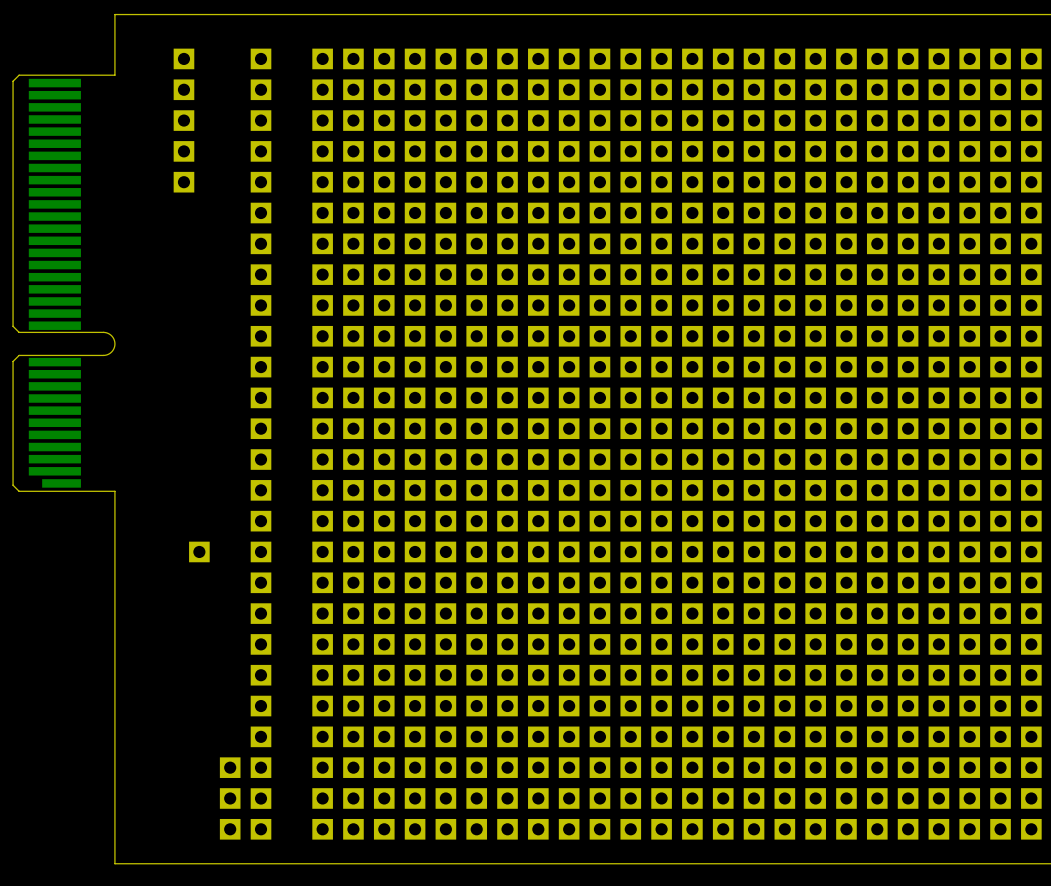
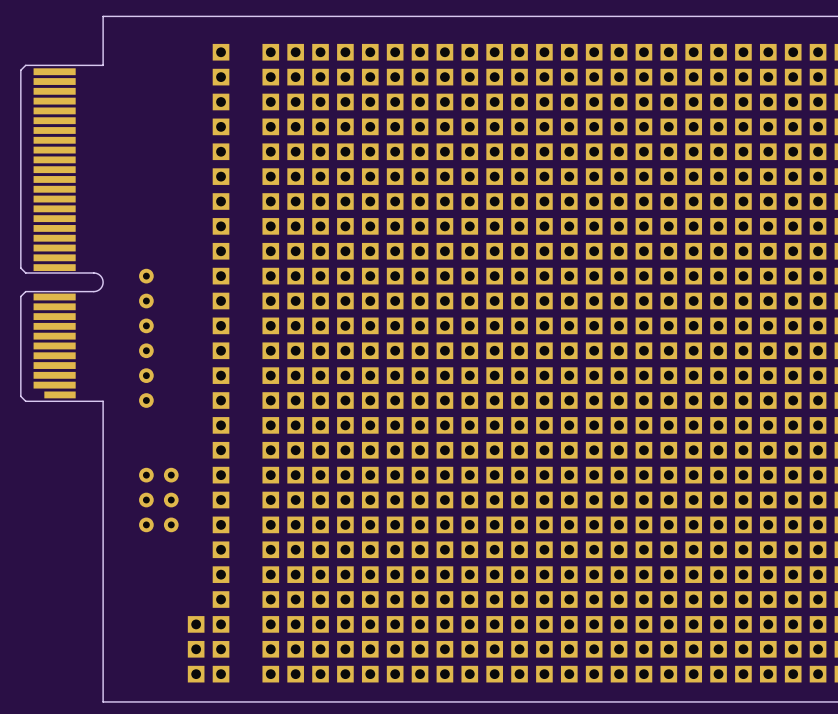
part: (183, 58) -> none
part: (183, 89) -> none
part: (183, 120) -> none
part: (183, 151) -> none
part: (183, 182) -> none
part: none -> (146, 276)
part: none -> (146, 301)
part: none -> (146, 325)
part: none -> (146, 350)
part: none -> (146, 375)
part: none -> (146, 400)
part: (199, 551) -> none
part: none -> (146, 475)
part: none -> (171, 475)
part: none -> (146, 500)
part: none -> (171, 500)
part: none -> (146, 524)
part: none -> (171, 524)

